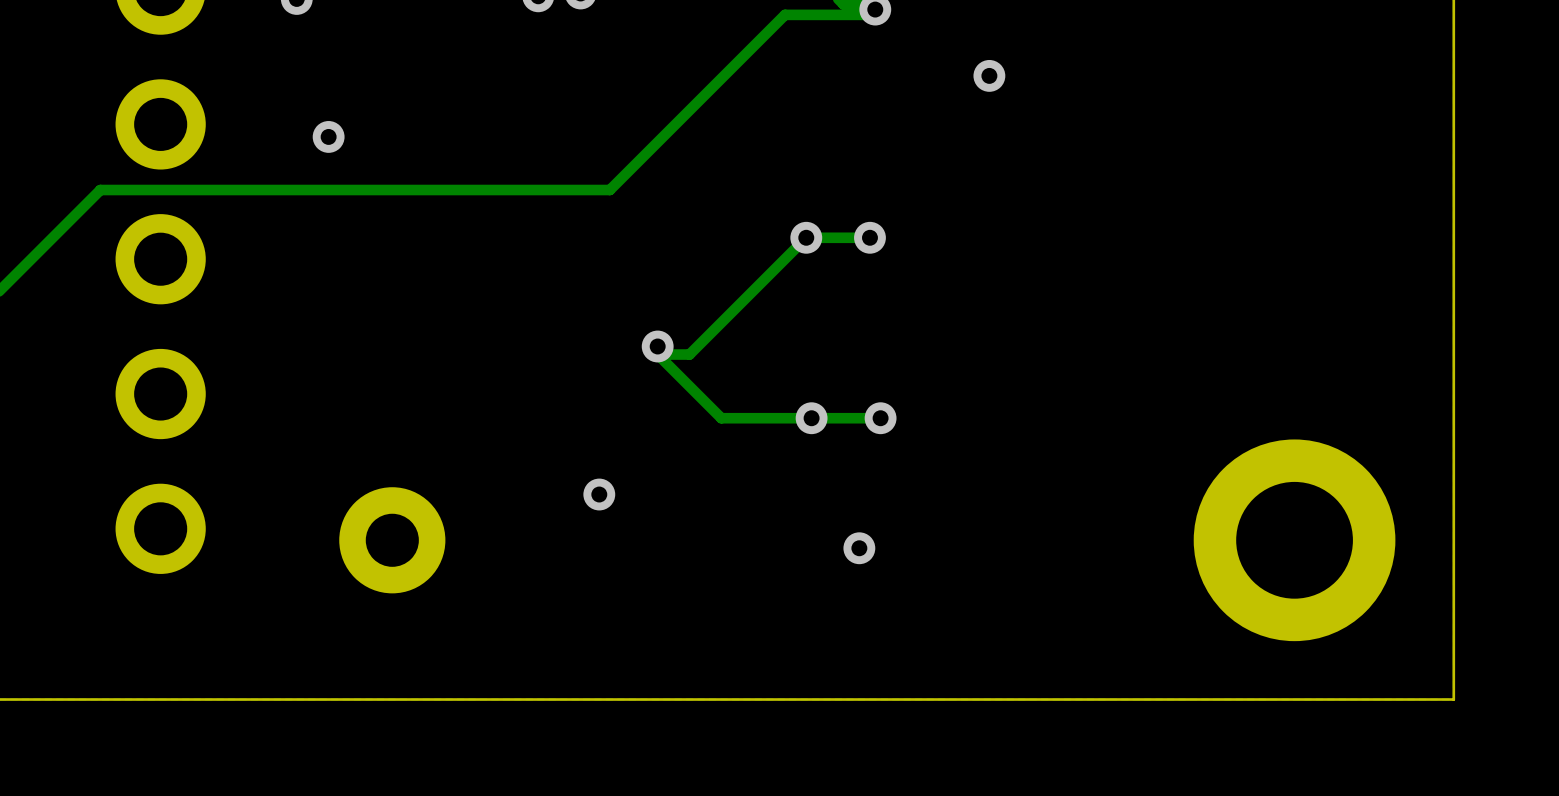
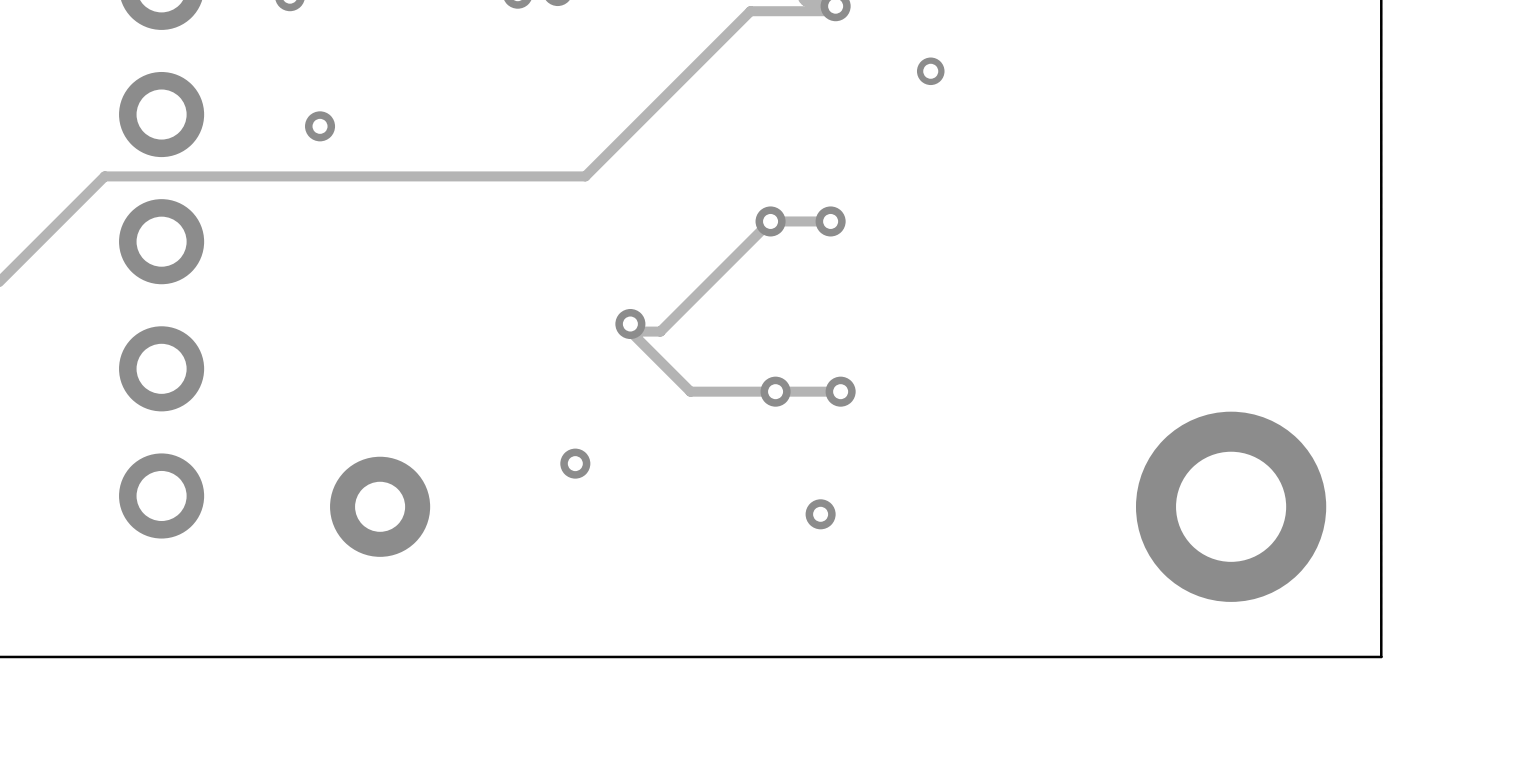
via position: (989, 75) -> (930, 71)

